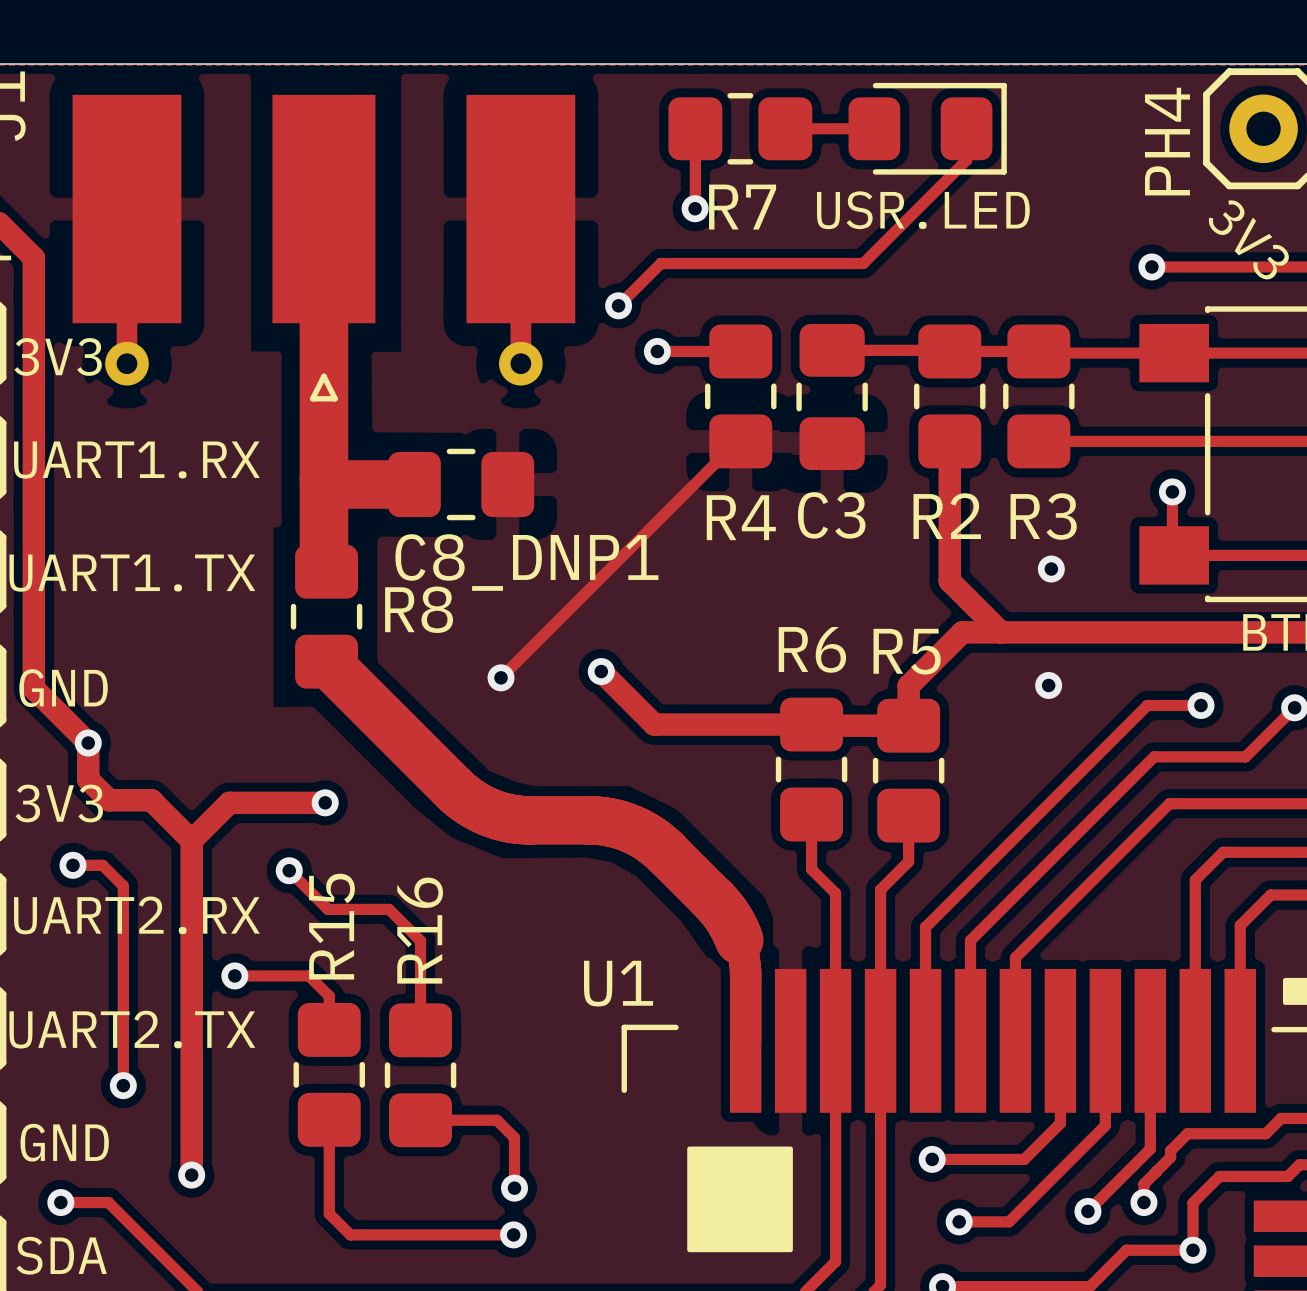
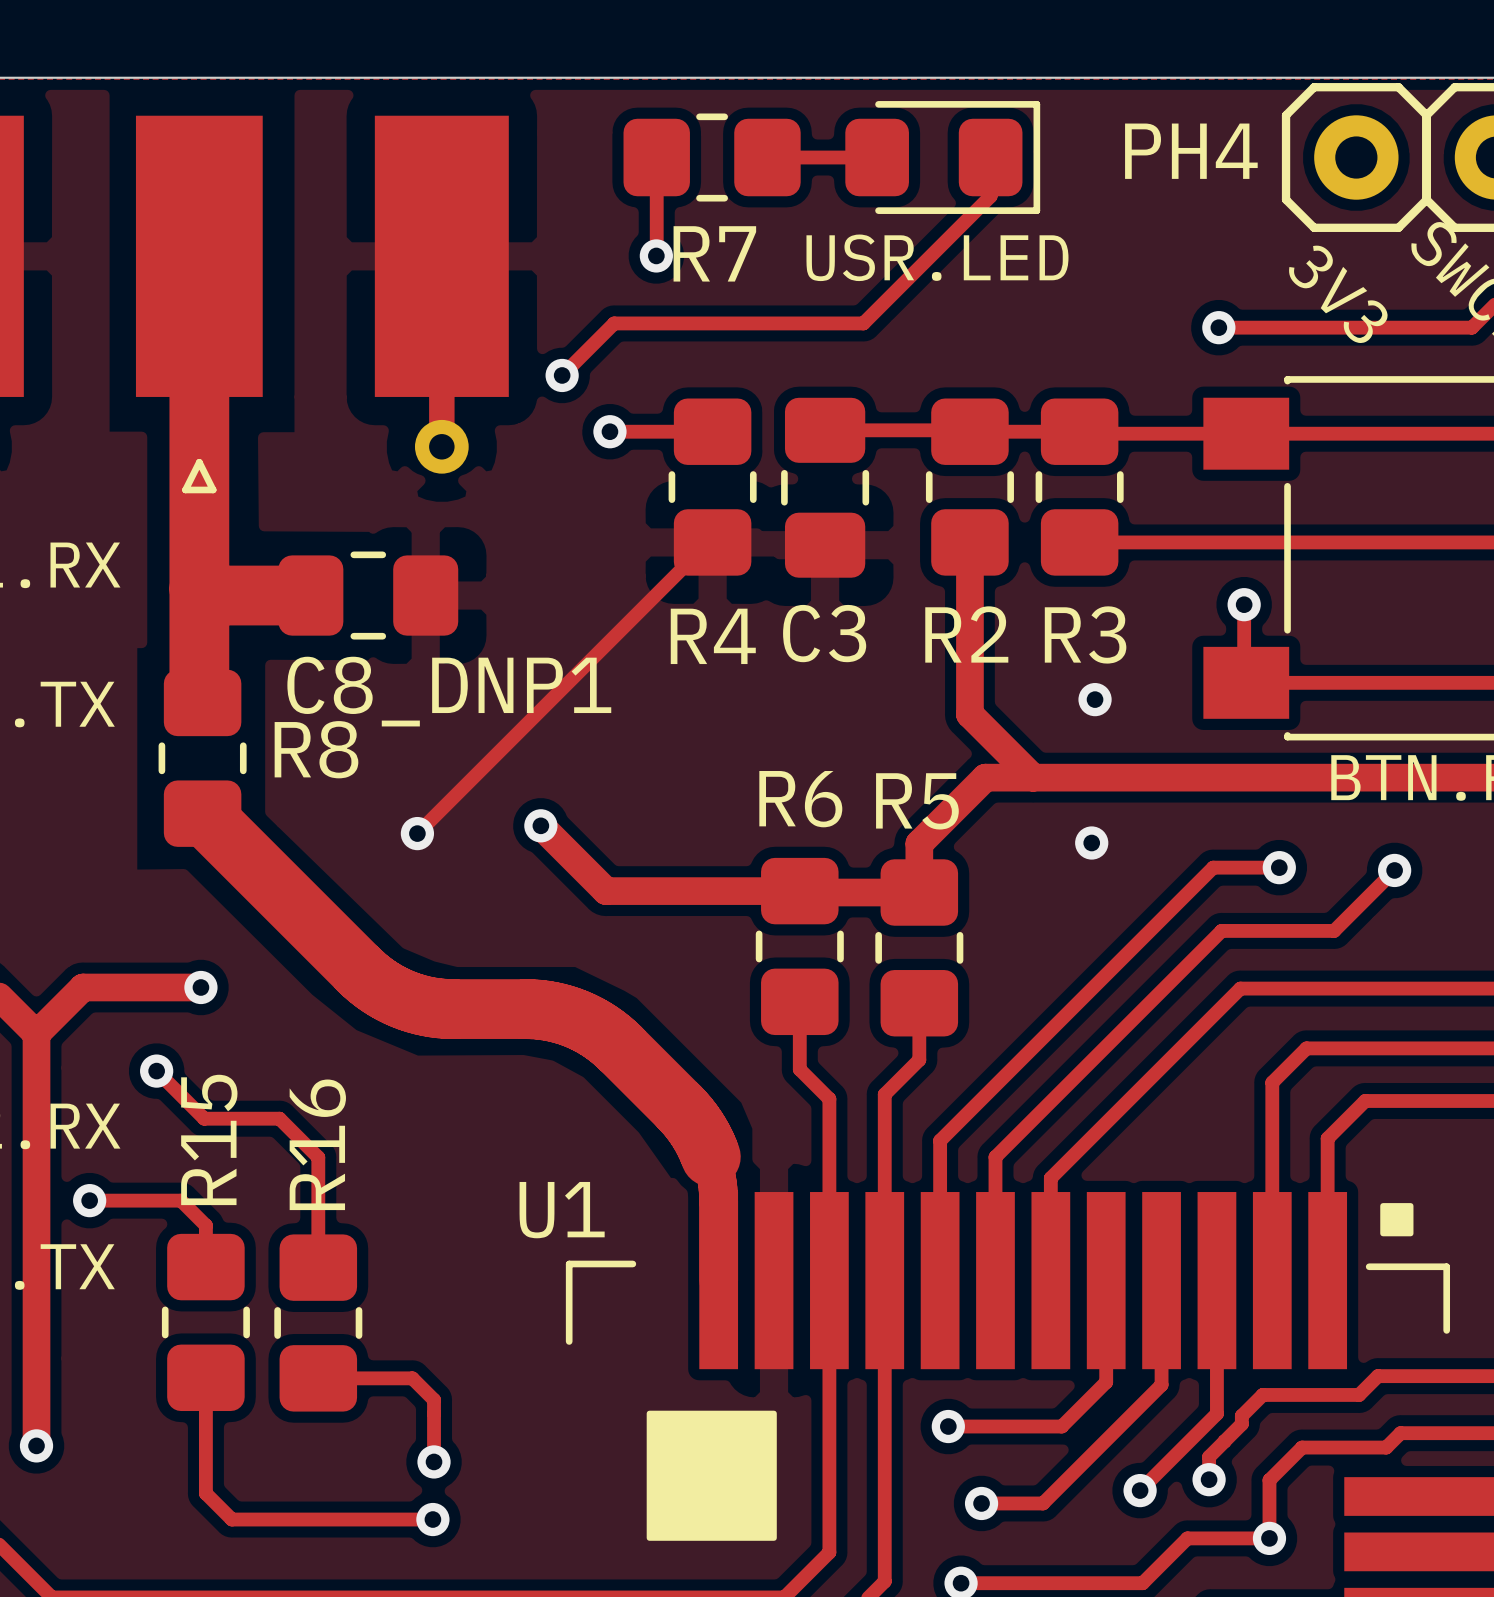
PH4 name rotation: 0° (1167, 141) -> 90° clockwise (1191, 151)

